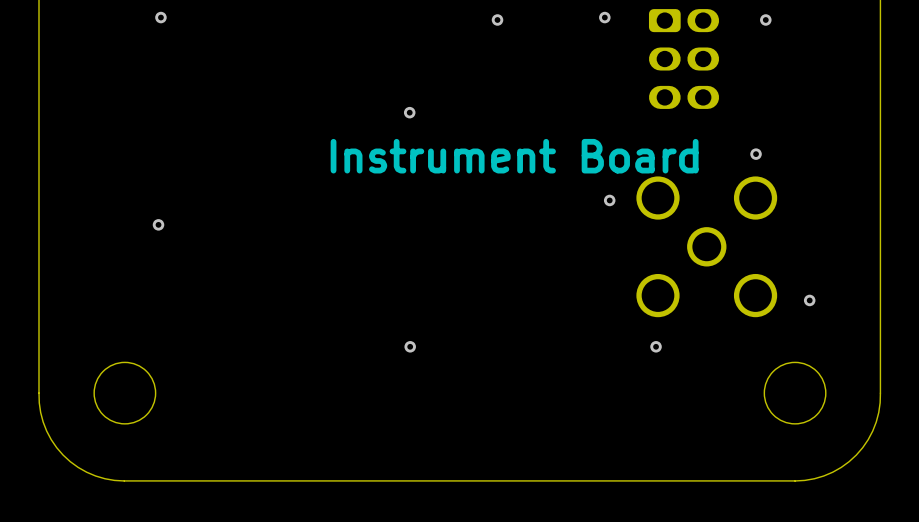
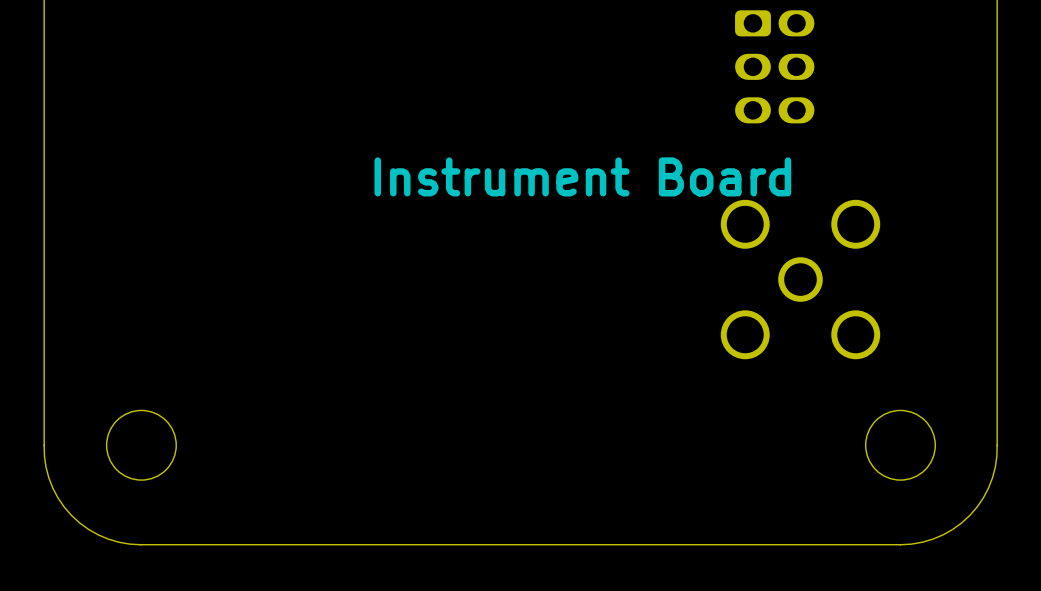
via: (160, 17) -> none
via: (604, 17) -> none
via: (497, 19) -> none
via: (765, 19) -> none
via: (409, 112) -> none
via: (756, 154) -> none
via: (609, 200) -> none
via: (158, 224) -> none
via: (809, 300) -> none
via: (410, 346) -> none
via: (656, 346) -> none

